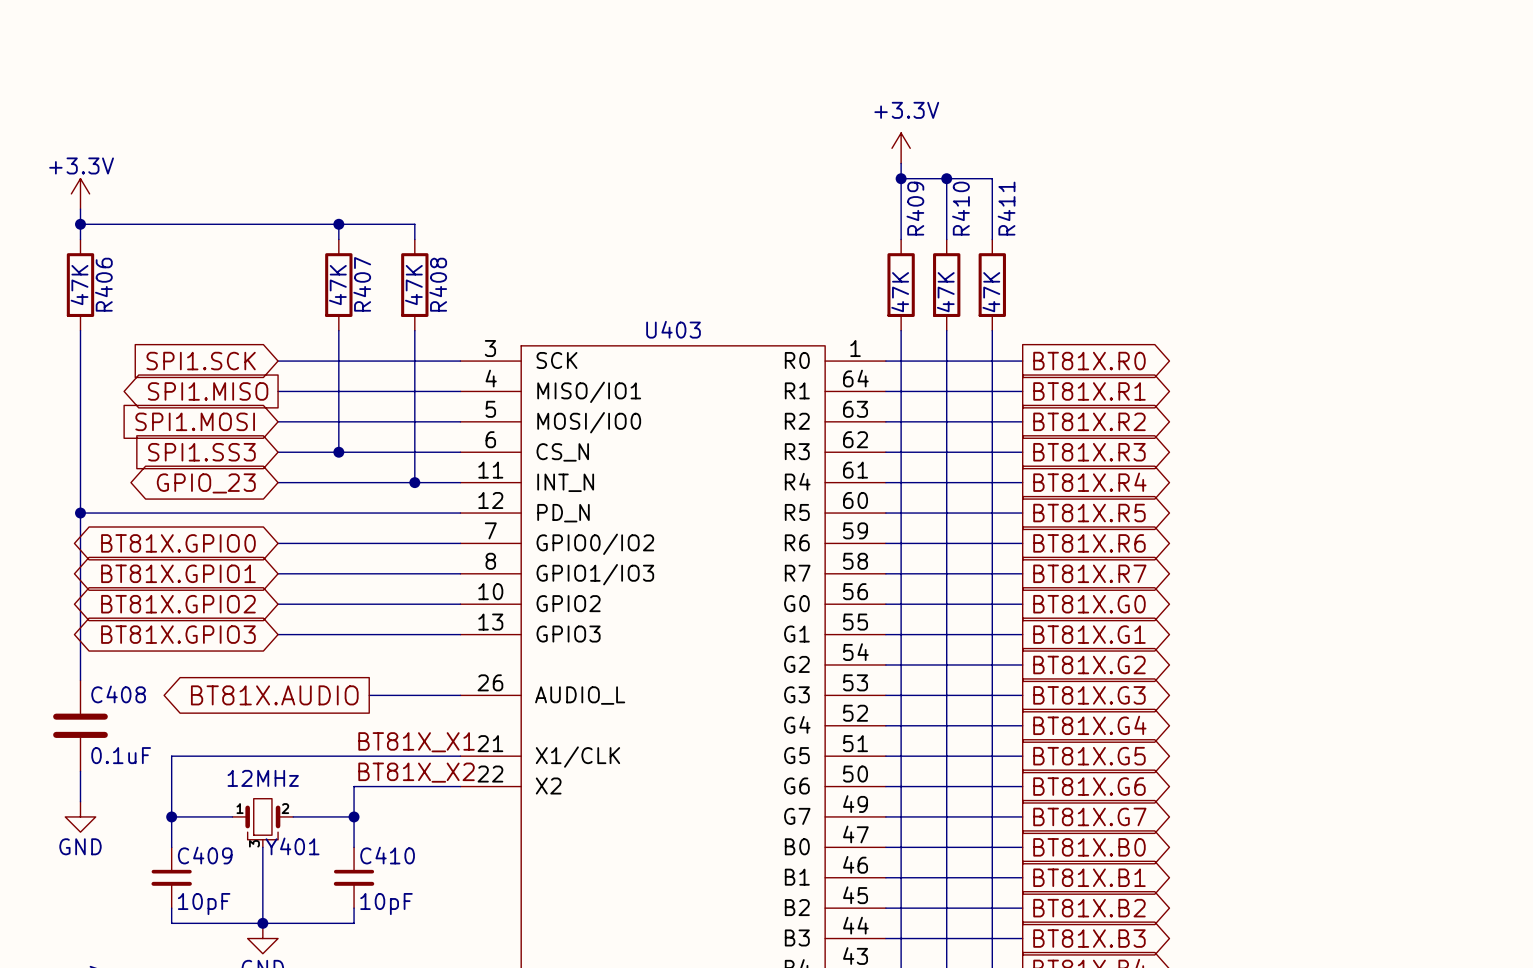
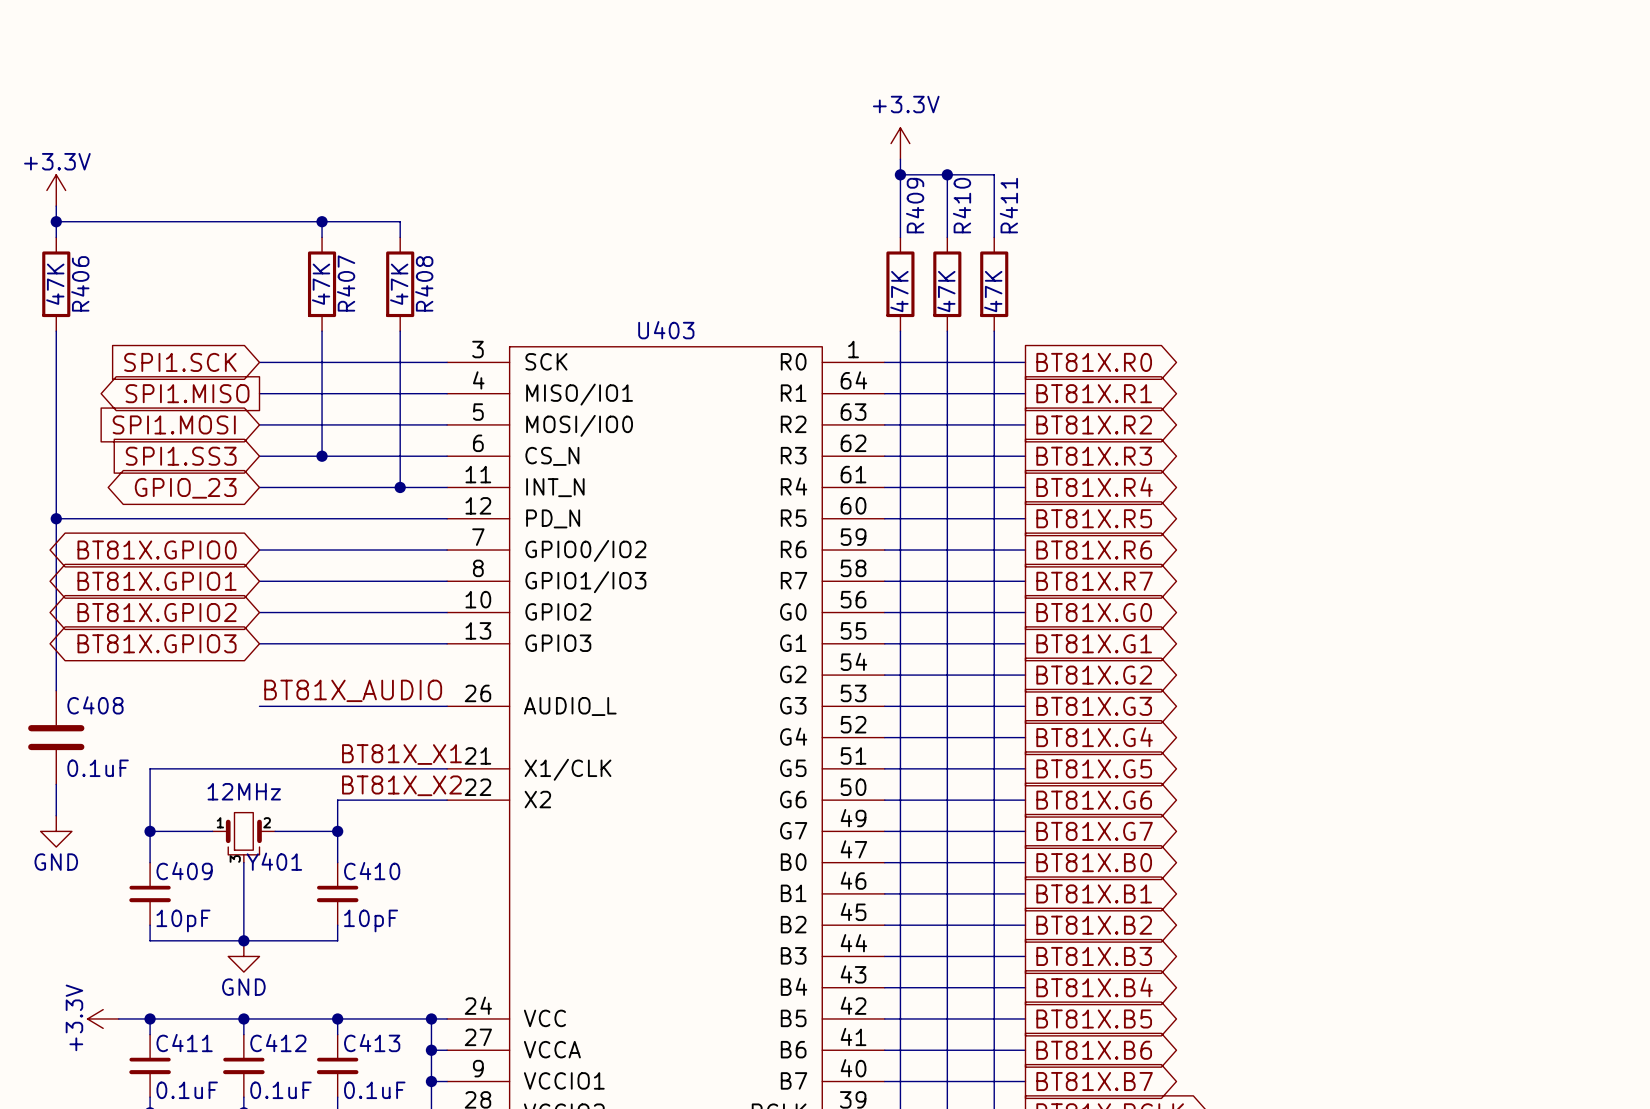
label: none -> BT81X_AUDIO (353, 690)
global label: BT81X.AUDIO (274, 695) -> none
wire: none -> (259, 706) (353, 706)

